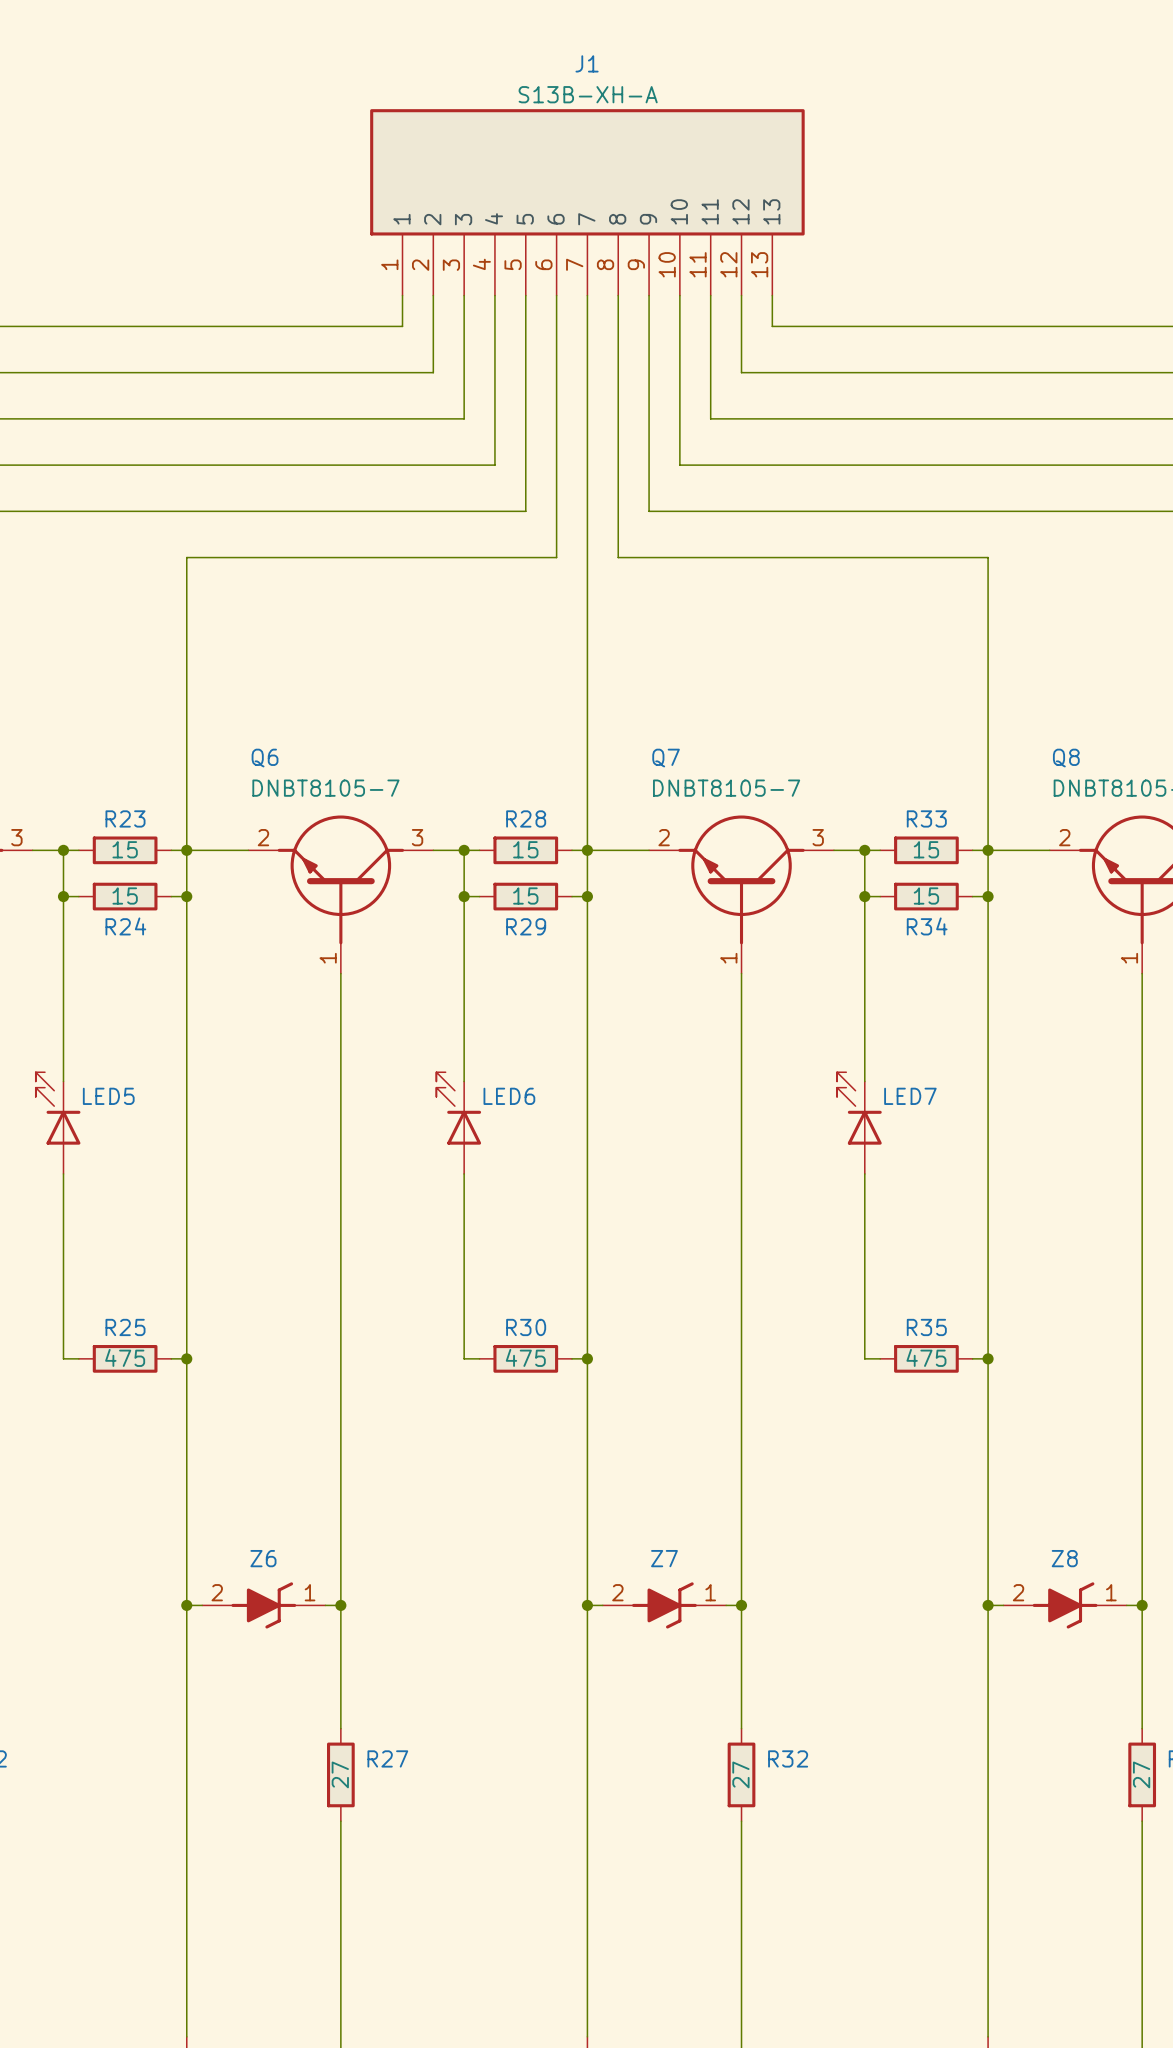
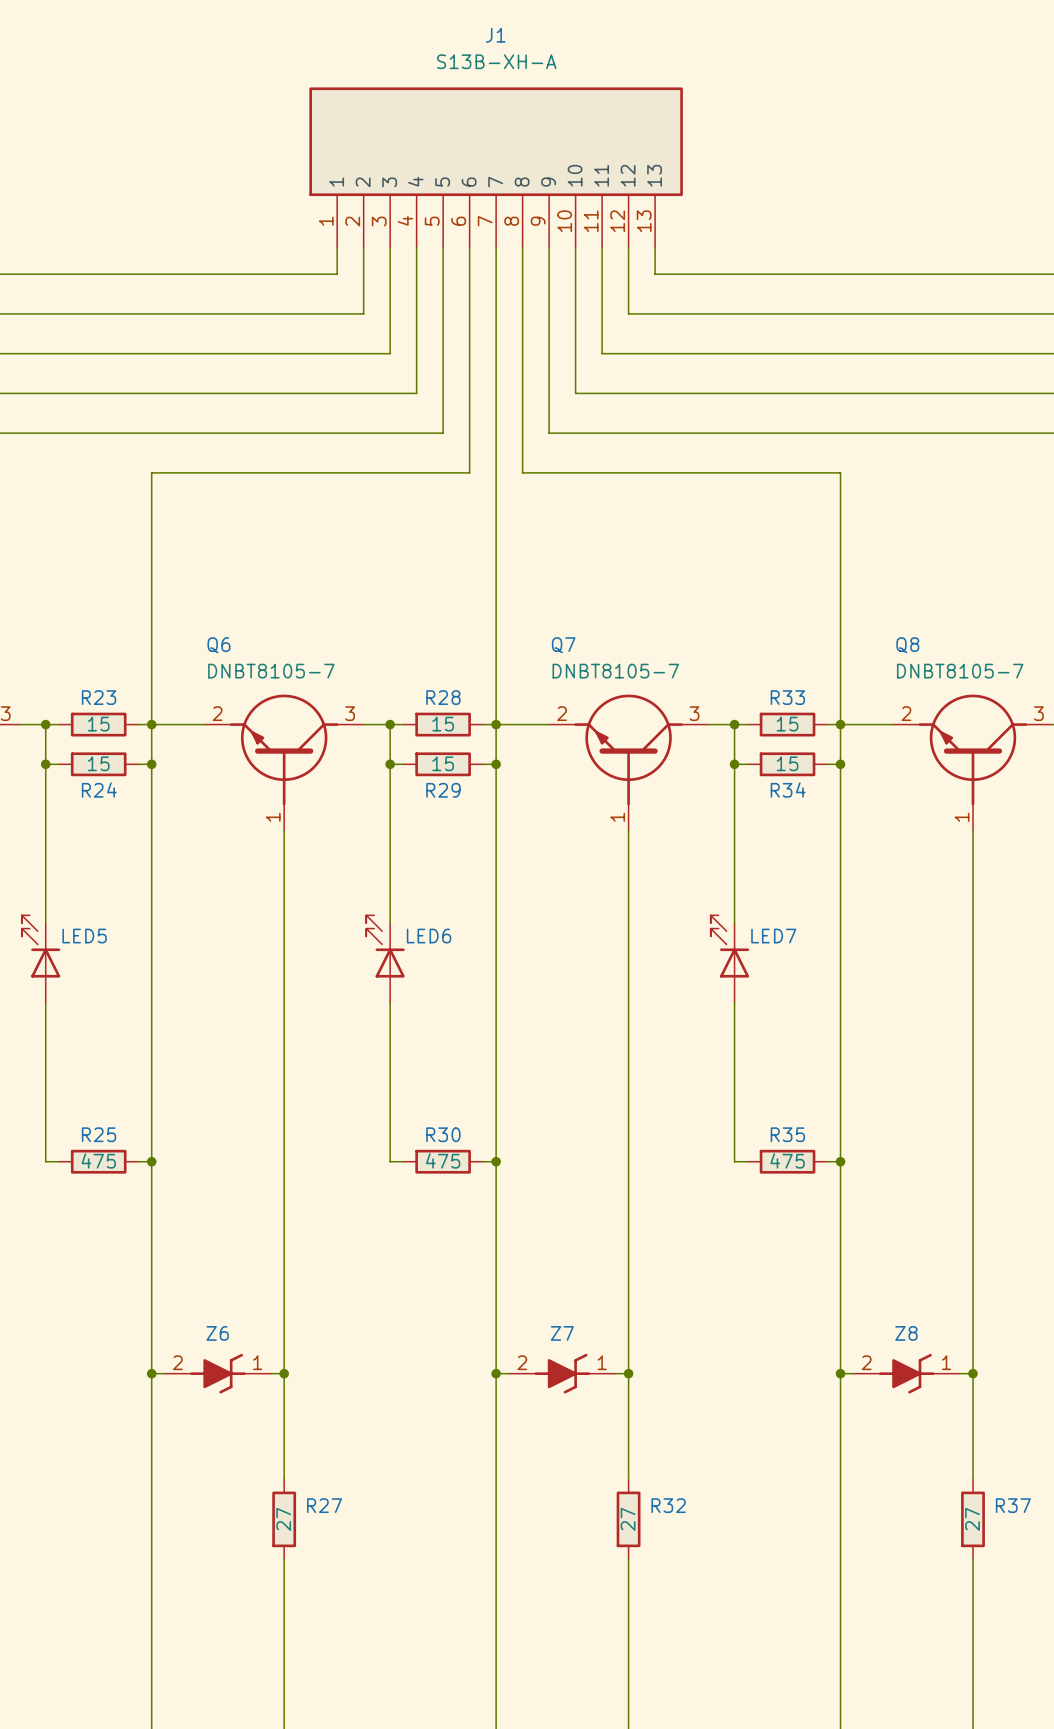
J1 name position: J1 (587, 63) -> J1 (495, 35)
J1 value position: S13B-XH-A (588, 94) -> S13B-XH-A (496, 61)

